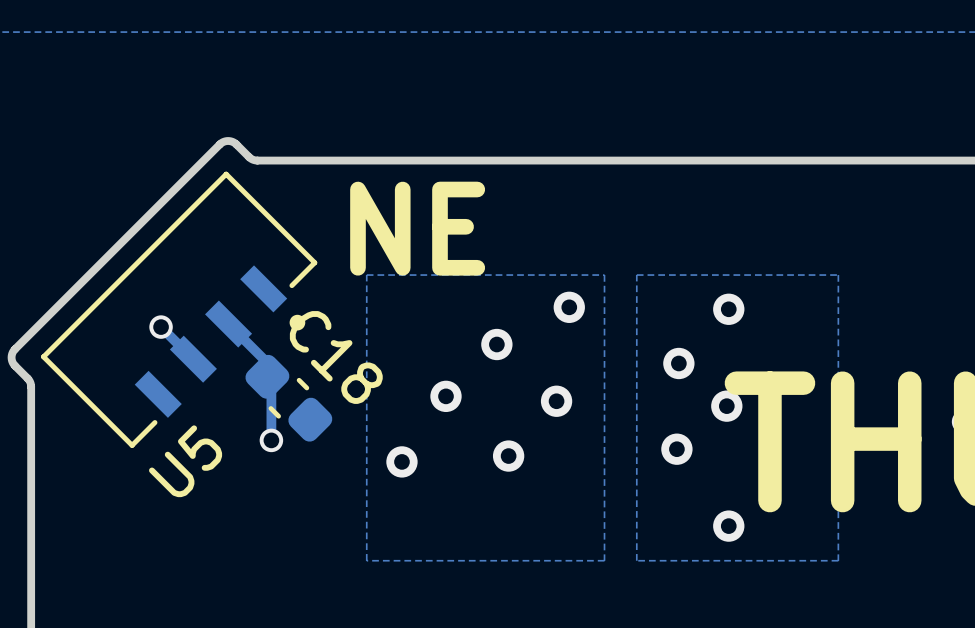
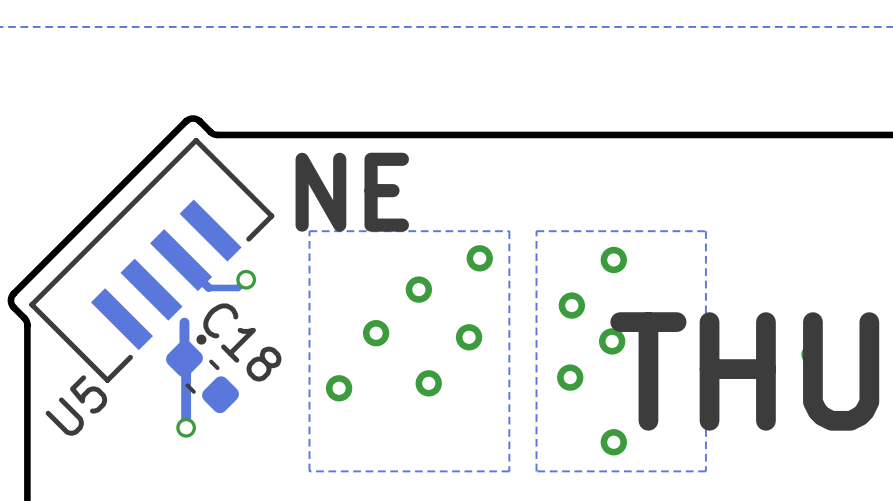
U5 footprint: [41, 171, 318, 448] -> [29, 137, 275, 383]
via: (161, 327) -> none
via: none -> (246, 279)
track: (247, 342) (267, 362) (267, 376) (271, 380) (271, 440) -> (208, 287) (237, 287) (246, 279)
track: none -> (184, 322) (186, 427)
C18 position: (288, 398) -> (202, 376)
via: (271, 440) -> none
U5 name position: U5 (185, 461) -> U5 (76, 405)
via: none -> (186, 427)

